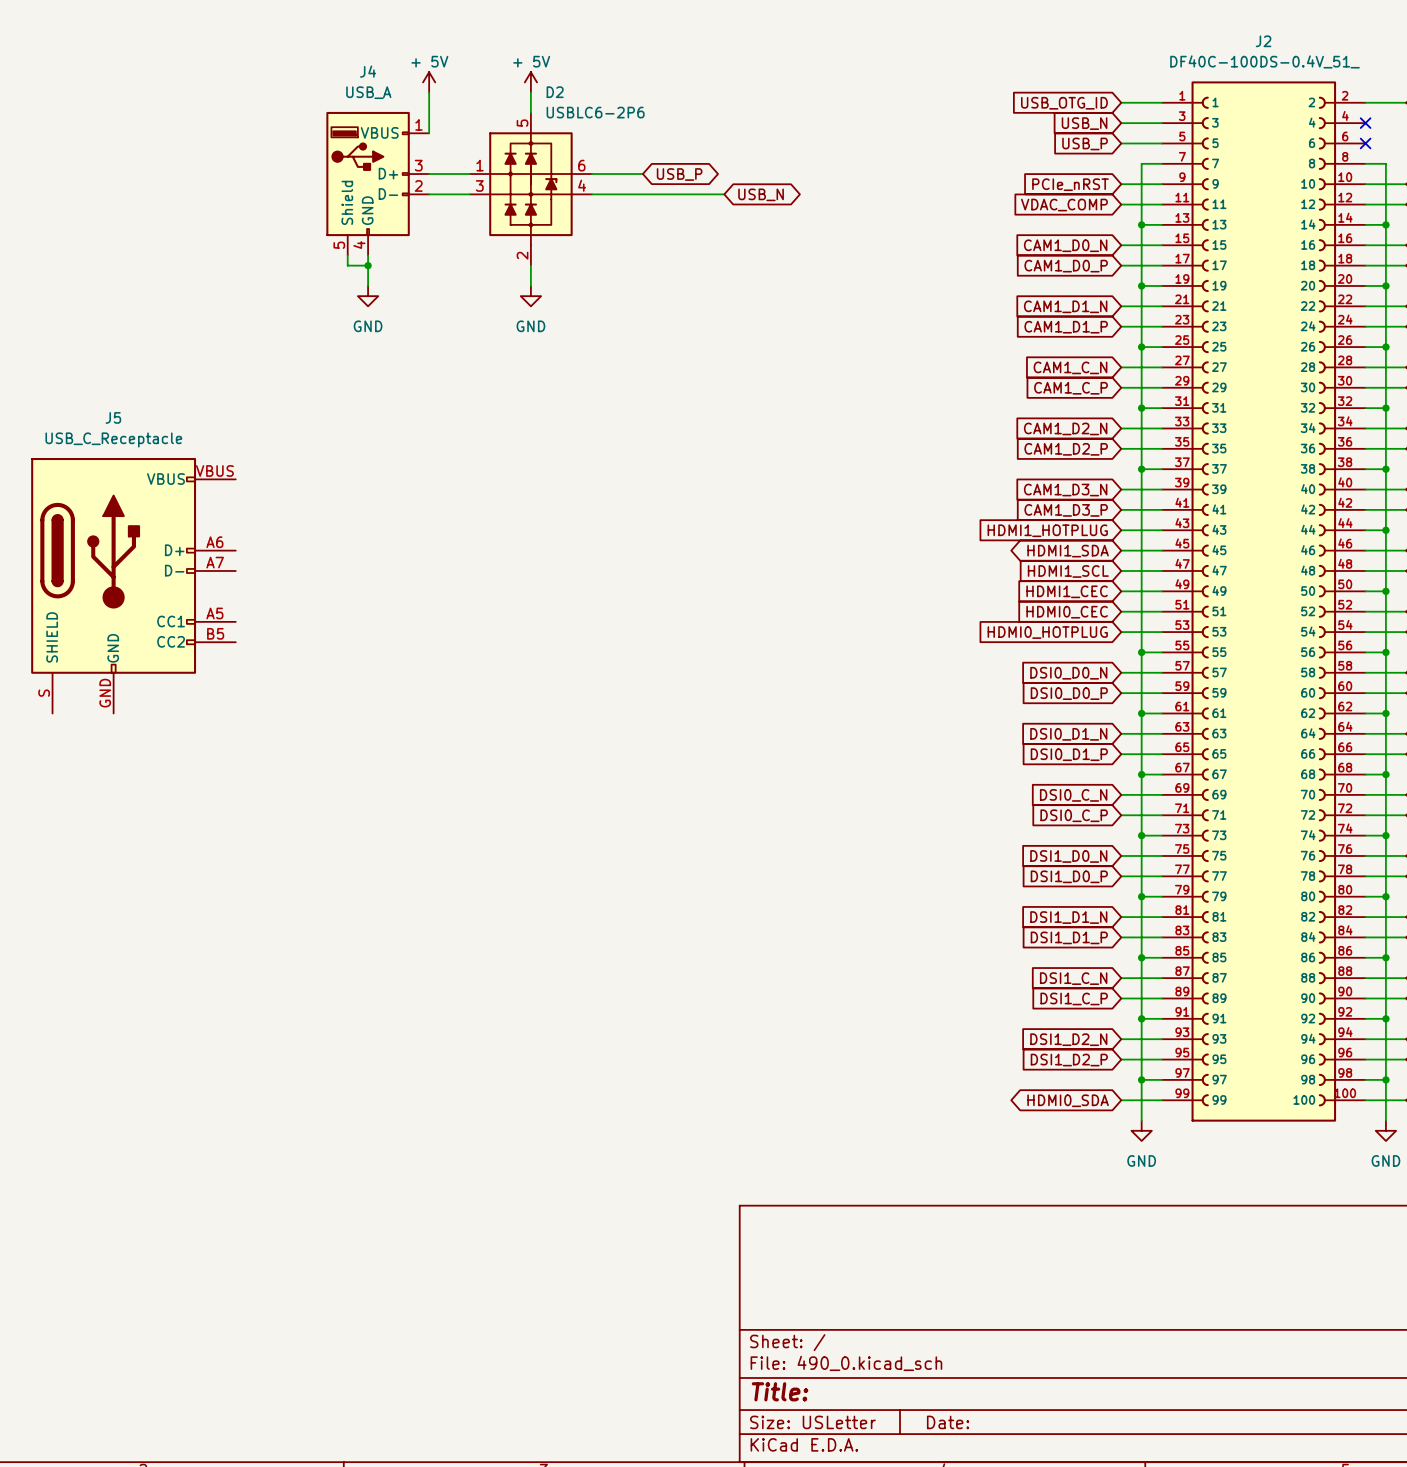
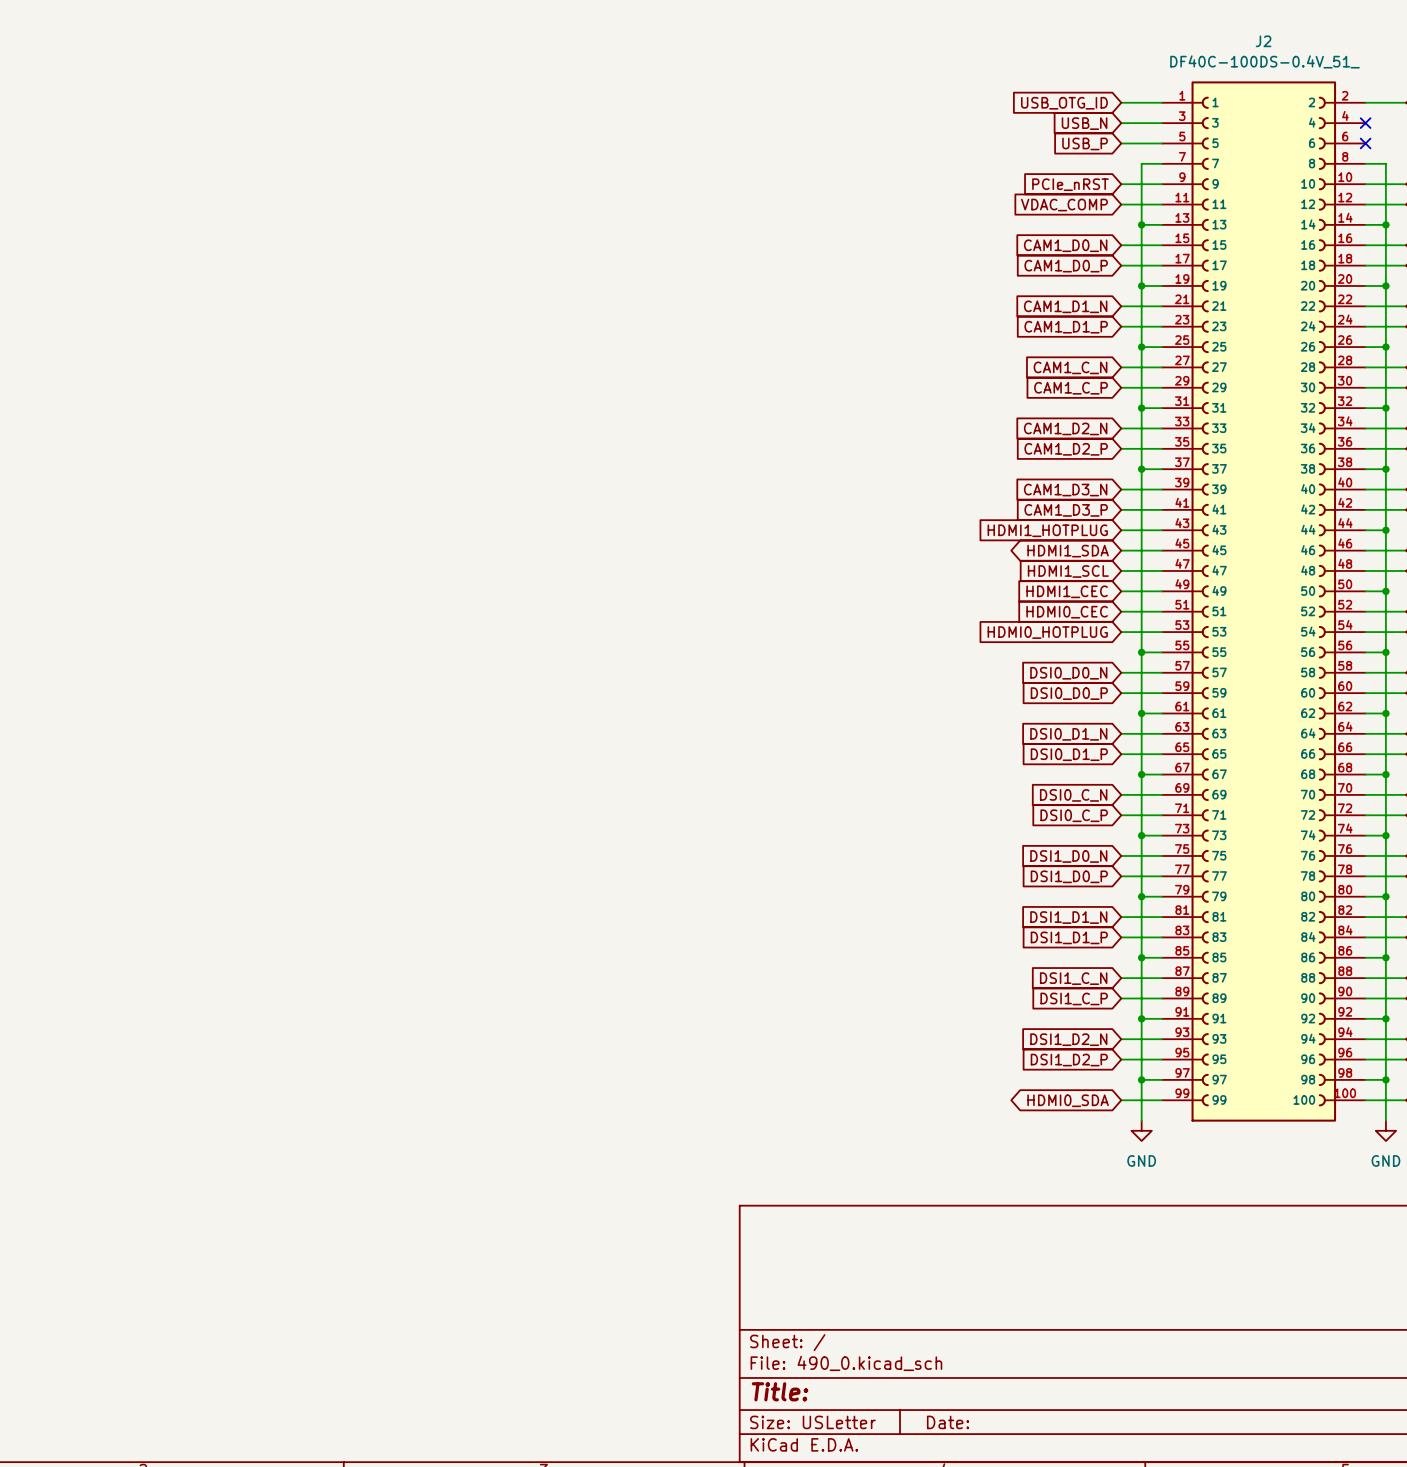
power symbol: + 5V (429, 82) -> none
power symbol: + 5V (530, 82) -> none
wire: (429, 92) (429, 133) -> none
wire: (530, 92) (530, 112) -> none
wire: (429, 174) (469, 174) -> none
wire: (592, 174) (642, 174) -> none
global label: USB_P (679, 174) -> none
J4: USB_A (377, 183) -> none
D2: USBLC6-2P6 (530, 189) -> none
wire: (429, 194) (469, 194) -> none
wire: (592, 194) (724, 194) -> none
global label: USB_N (761, 194) -> none
wire: (347, 255) (347, 265) (368, 265) -> none
wire: (368, 255) (368, 285) -> none
junction: (368, 265) -> none
wire: (530, 265) (530, 285) -> none
power symbol: GND (368, 296) -> none
power symbol: GND (530, 296) -> none
J5: USB_C_Receptacle (133, 585) -> none

